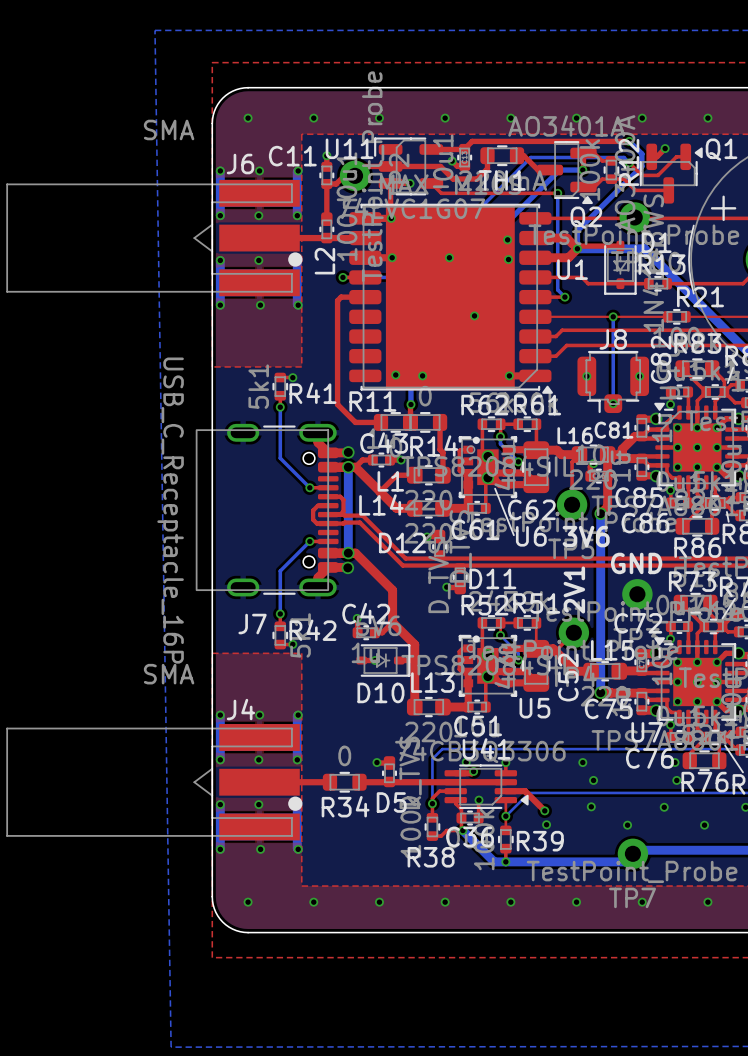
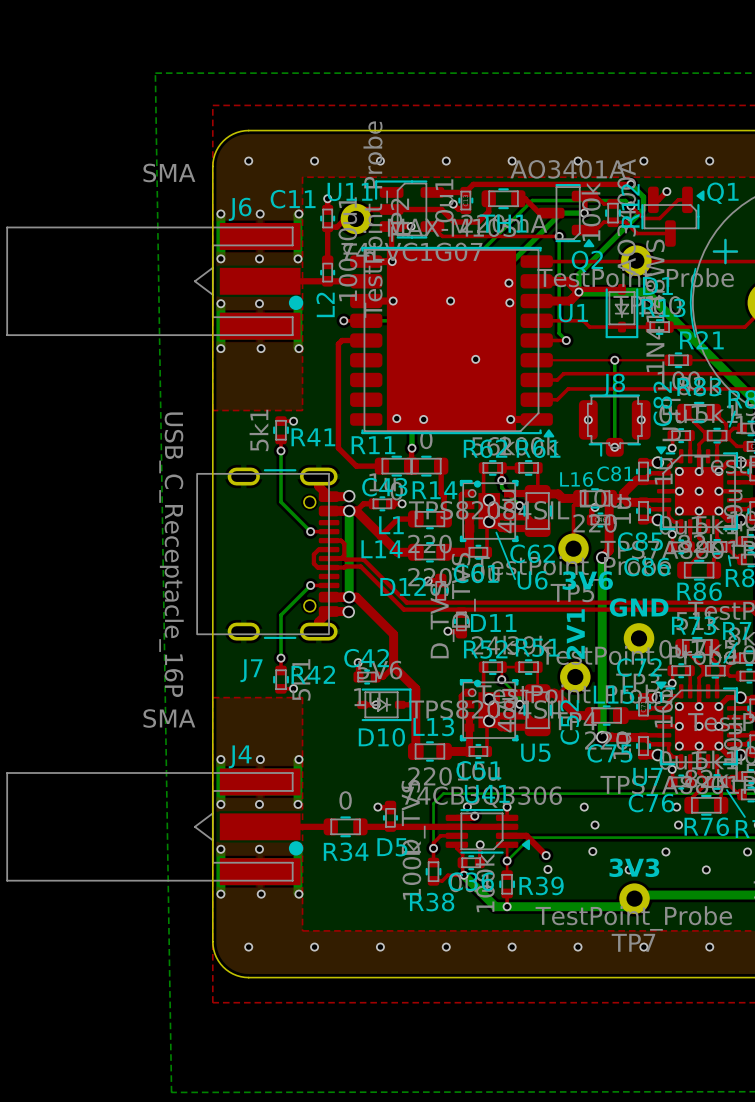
text: none -> 3V3 (634, 867)

